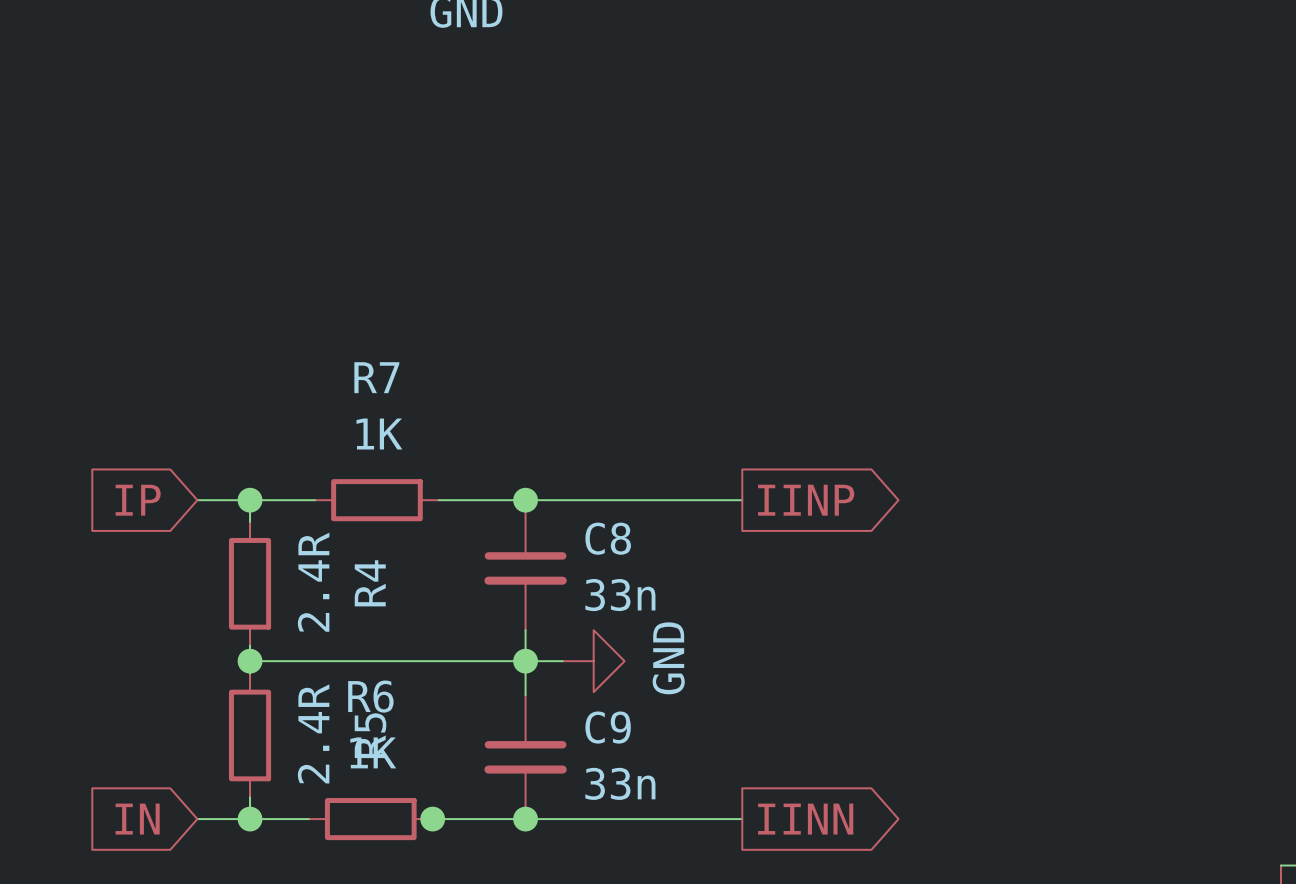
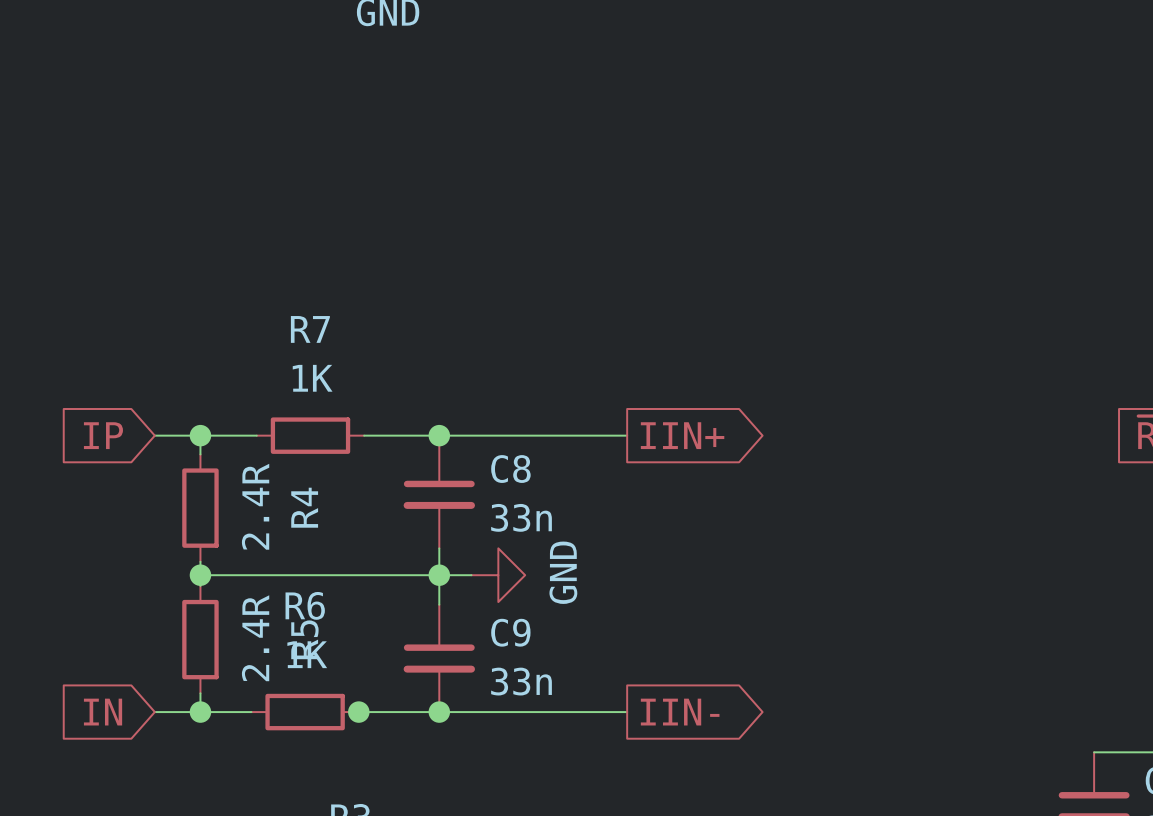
global label: IINP (806, 500) -> IIN+ (682, 435)
global label: IINN (805, 819) -> IIN- (680, 712)

